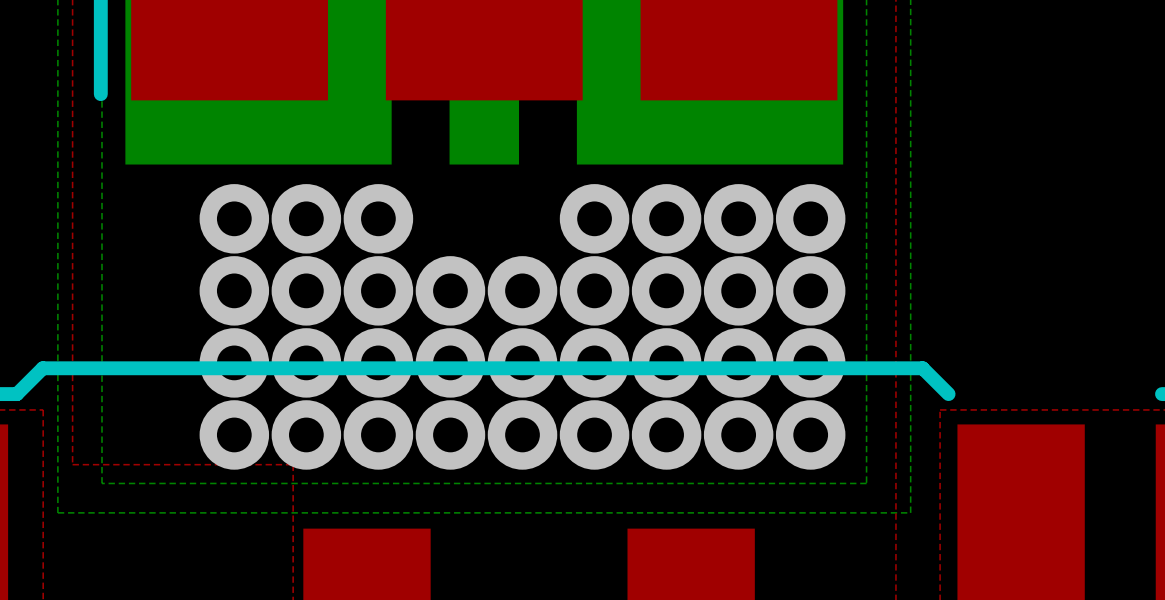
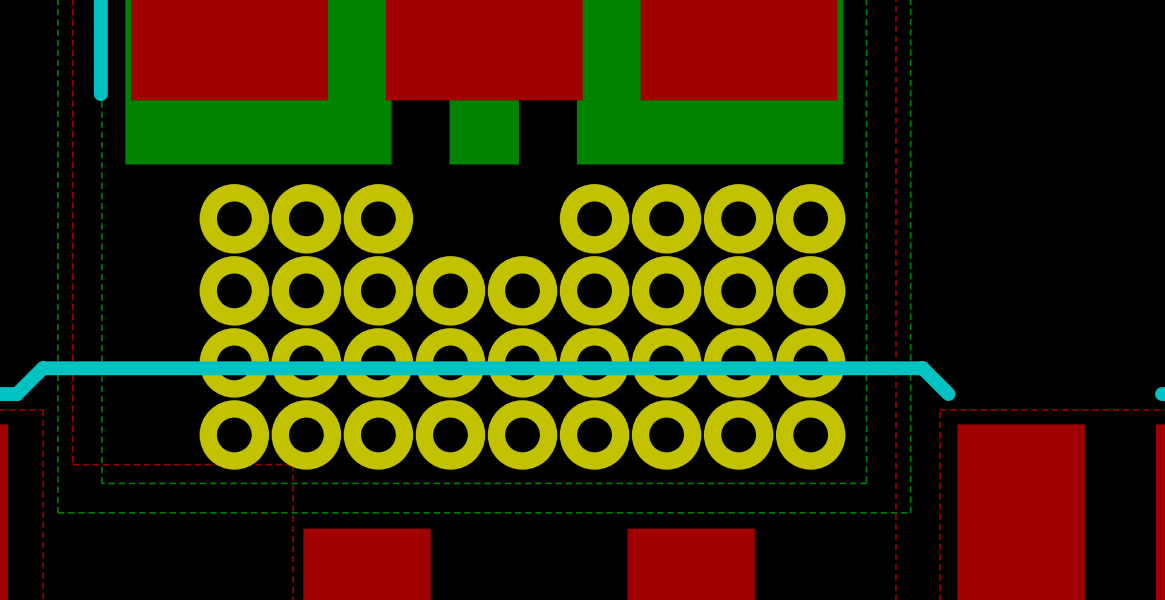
part: none -> (234, 218)
via: (234, 218) -> none
part: none -> (306, 218)
via: (306, 218) -> none
part: none -> (378, 218)
via: (378, 218) -> none
part: none -> (594, 218)
via: (594, 218) -> none
part: none -> (666, 218)
via: (666, 218) -> none
part: none -> (738, 218)
via: (738, 218) -> none
part: none -> (810, 218)
via: (810, 218) -> none
part: none -> (234, 290)
via: (234, 290) -> none
part: none -> (306, 290)
via: (306, 290) -> none
part: none -> (378, 290)
via: (378, 290) -> none
part: none -> (450, 290)
via: (450, 290) -> none
part: none -> (522, 290)
via: (522, 290) -> none
part: none -> (594, 290)
via: (594, 290) -> none
part: none -> (666, 290)
via: (666, 290) -> none
part: none -> (738, 290)
via: (738, 290) -> none
part: none -> (810, 290)
via: (810, 290) -> none
part: none -> (234, 362)
via: (234, 362) -> none
part: none -> (306, 362)
via: (306, 362) -> none
part: none -> (378, 362)
via: (378, 362) -> none
part: none -> (450, 362)
via: (450, 362) -> none
part: none -> (522, 362)
via: (522, 362) -> none
part: none -> (594, 362)
via: (594, 362) -> none
part: none -> (666, 362)
via: (666, 362) -> none
part: none -> (738, 362)
via: (738, 362) -> none
part: none -> (810, 362)
via: (810, 362) -> none
part: none -> (234, 434)
via: (234, 434) -> none
part: none -> (306, 434)
via: (306, 434) -> none
part: none -> (378, 434)
via: (378, 434) -> none
part: none -> (450, 434)
via: (450, 434) -> none
part: none -> (522, 434)
via: (522, 434) -> none
part: none -> (594, 434)
via: (594, 434) -> none
part: none -> (666, 434)
via: (666, 434) -> none
part: none -> (738, 434)
via: (738, 434) -> none
part: none -> (810, 434)
via: (810, 434) -> none

